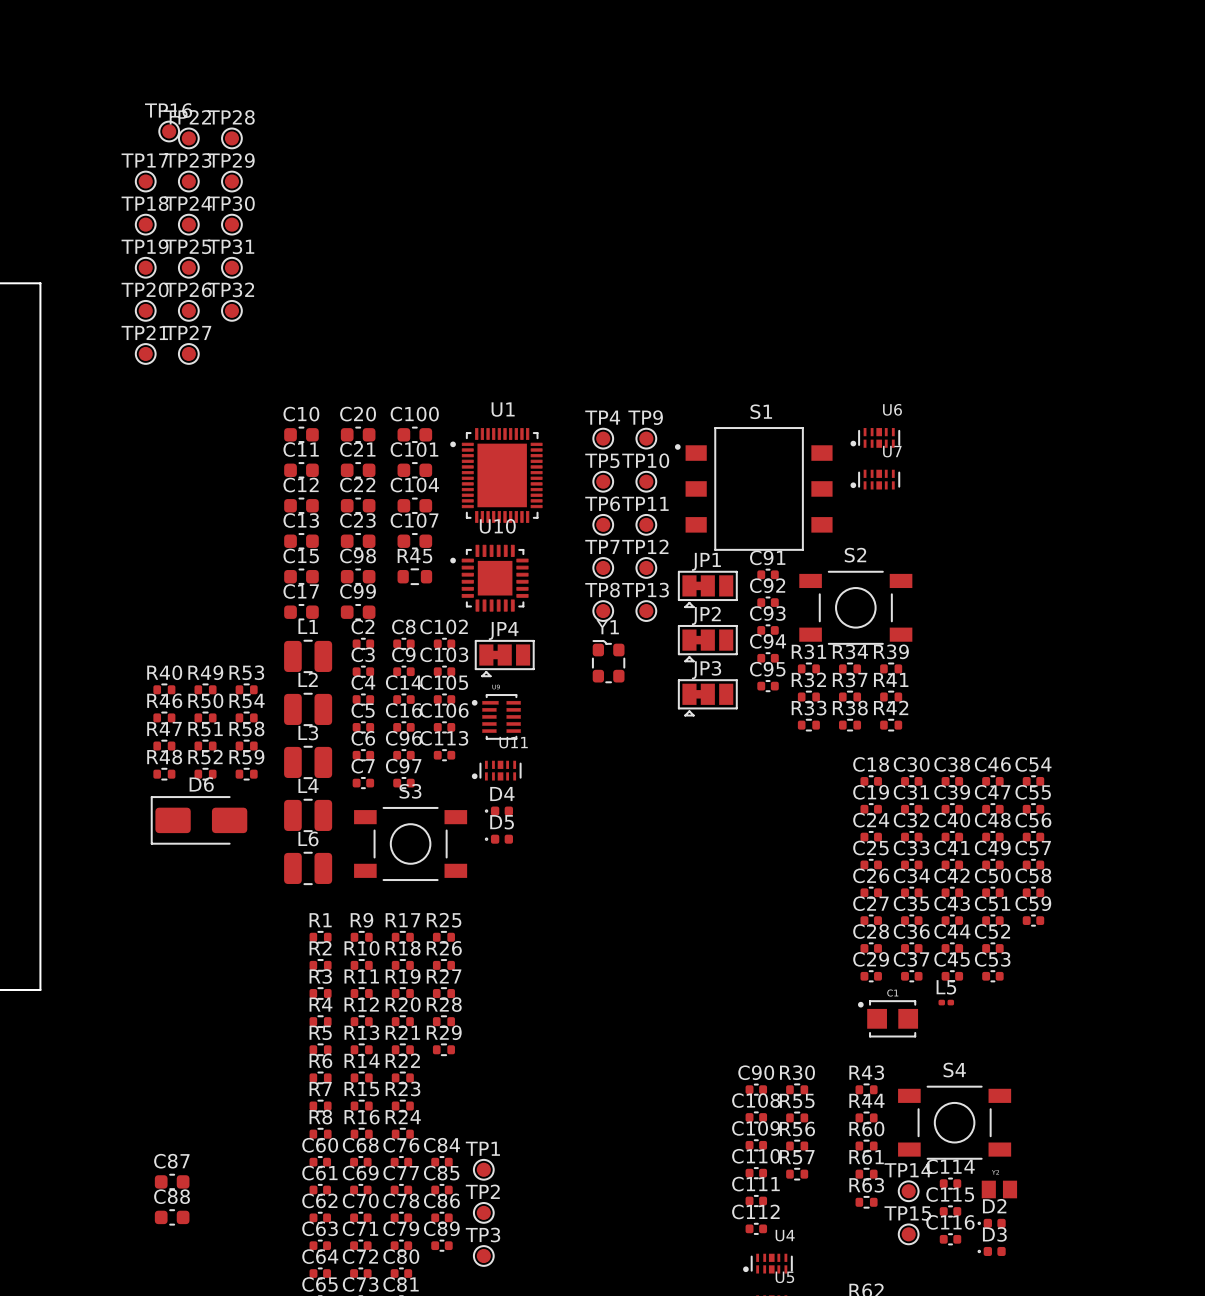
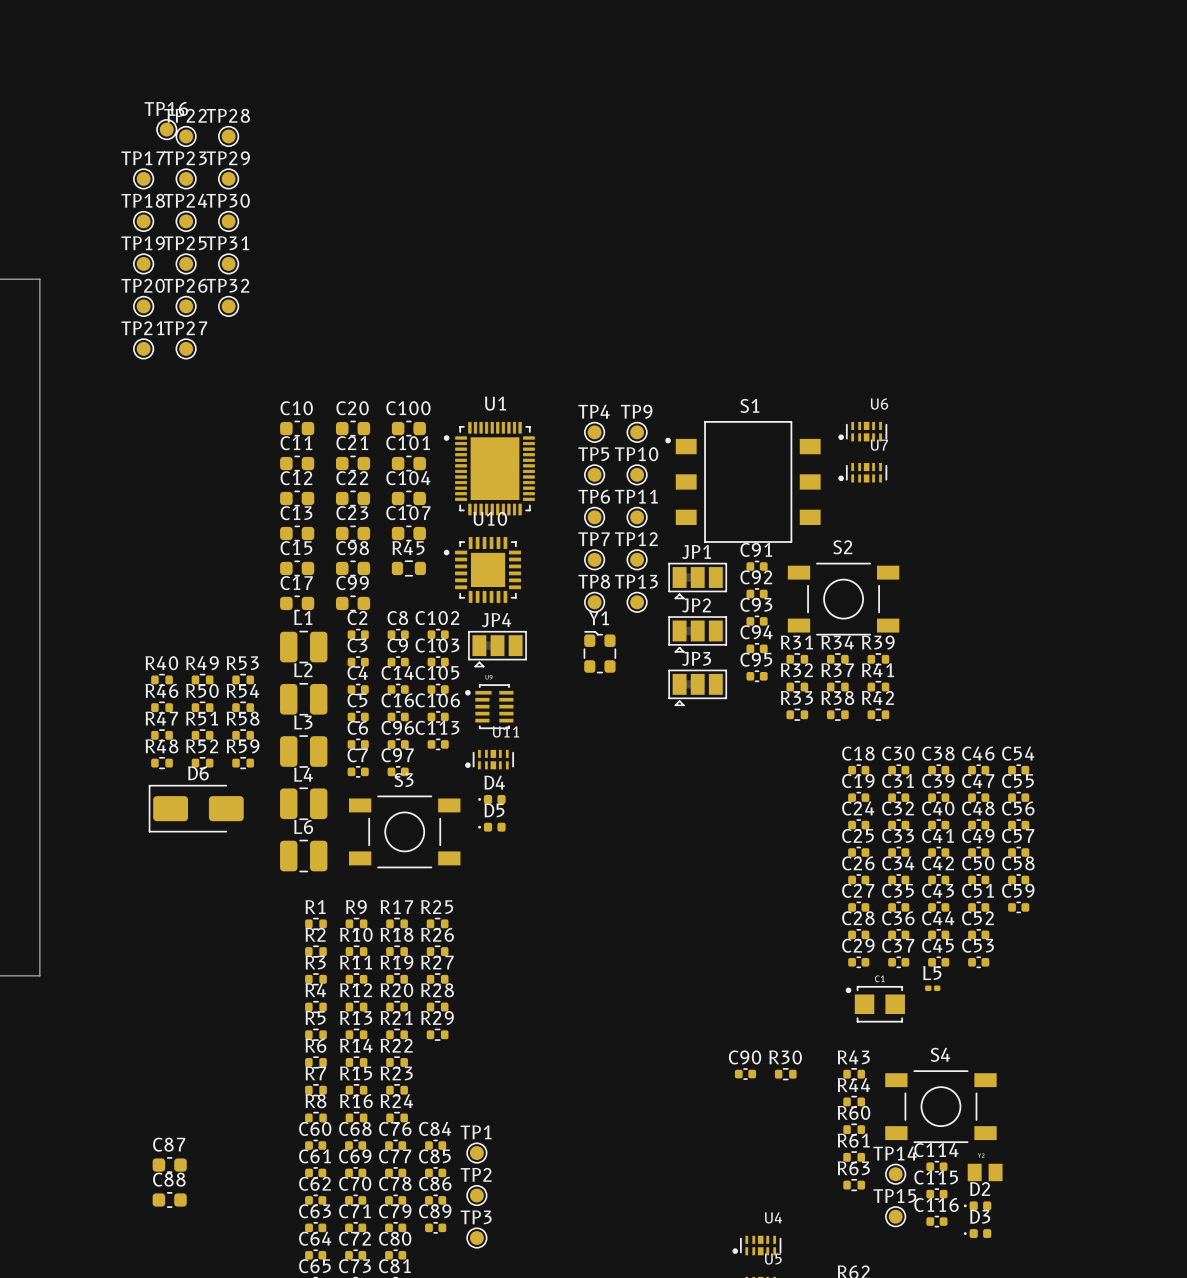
C108: (756, 1117) -> none
R55: (797, 1117) -> none
C109: (756, 1145) -> none
R56: (797, 1146) -> none
C110: (756, 1173) -> none
R57: (797, 1174) -> none
C111: (756, 1201) -> none
C112: (756, 1228) -> none

